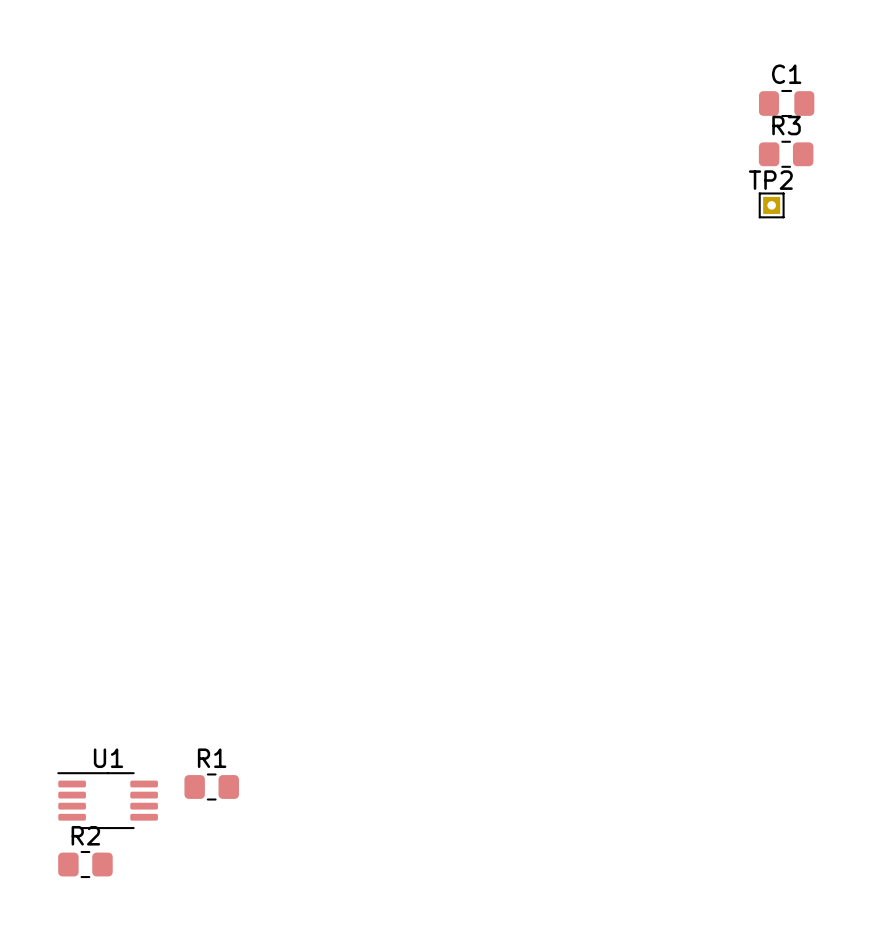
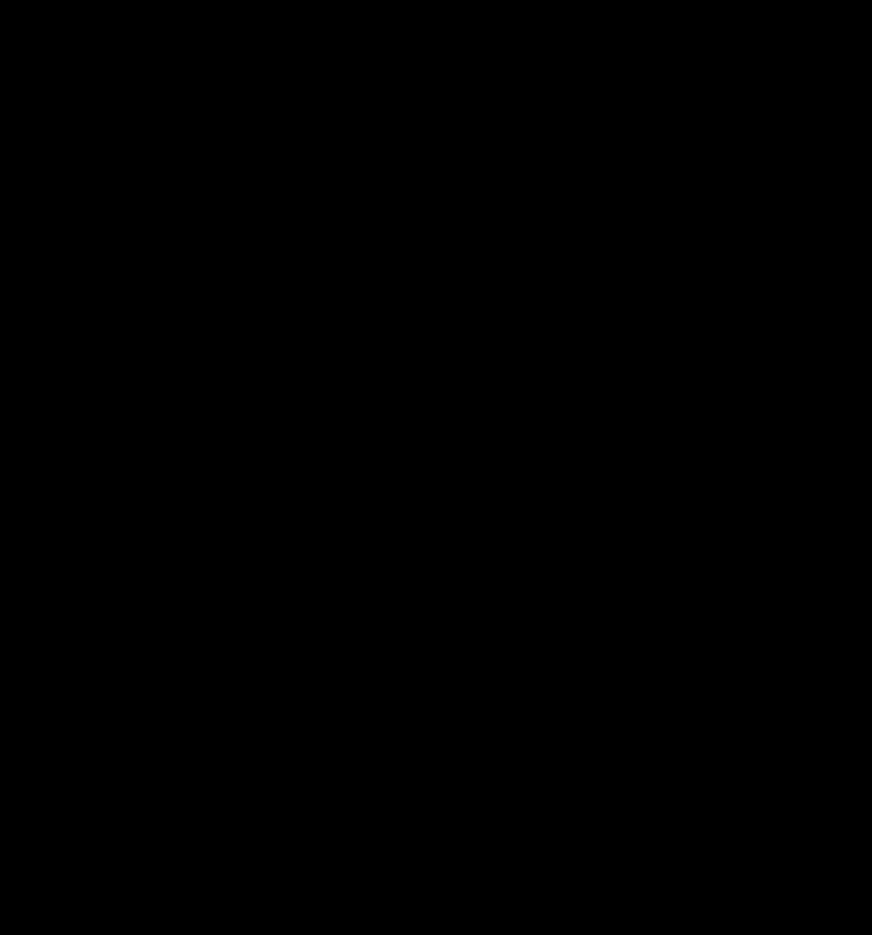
C1: (786, 103) -> none
R3: (786, 154) -> none
TP2: (771, 205) -> none
R1: (211, 786) -> none
U1: (107, 800) -> none
R2: (85, 864) -> none

